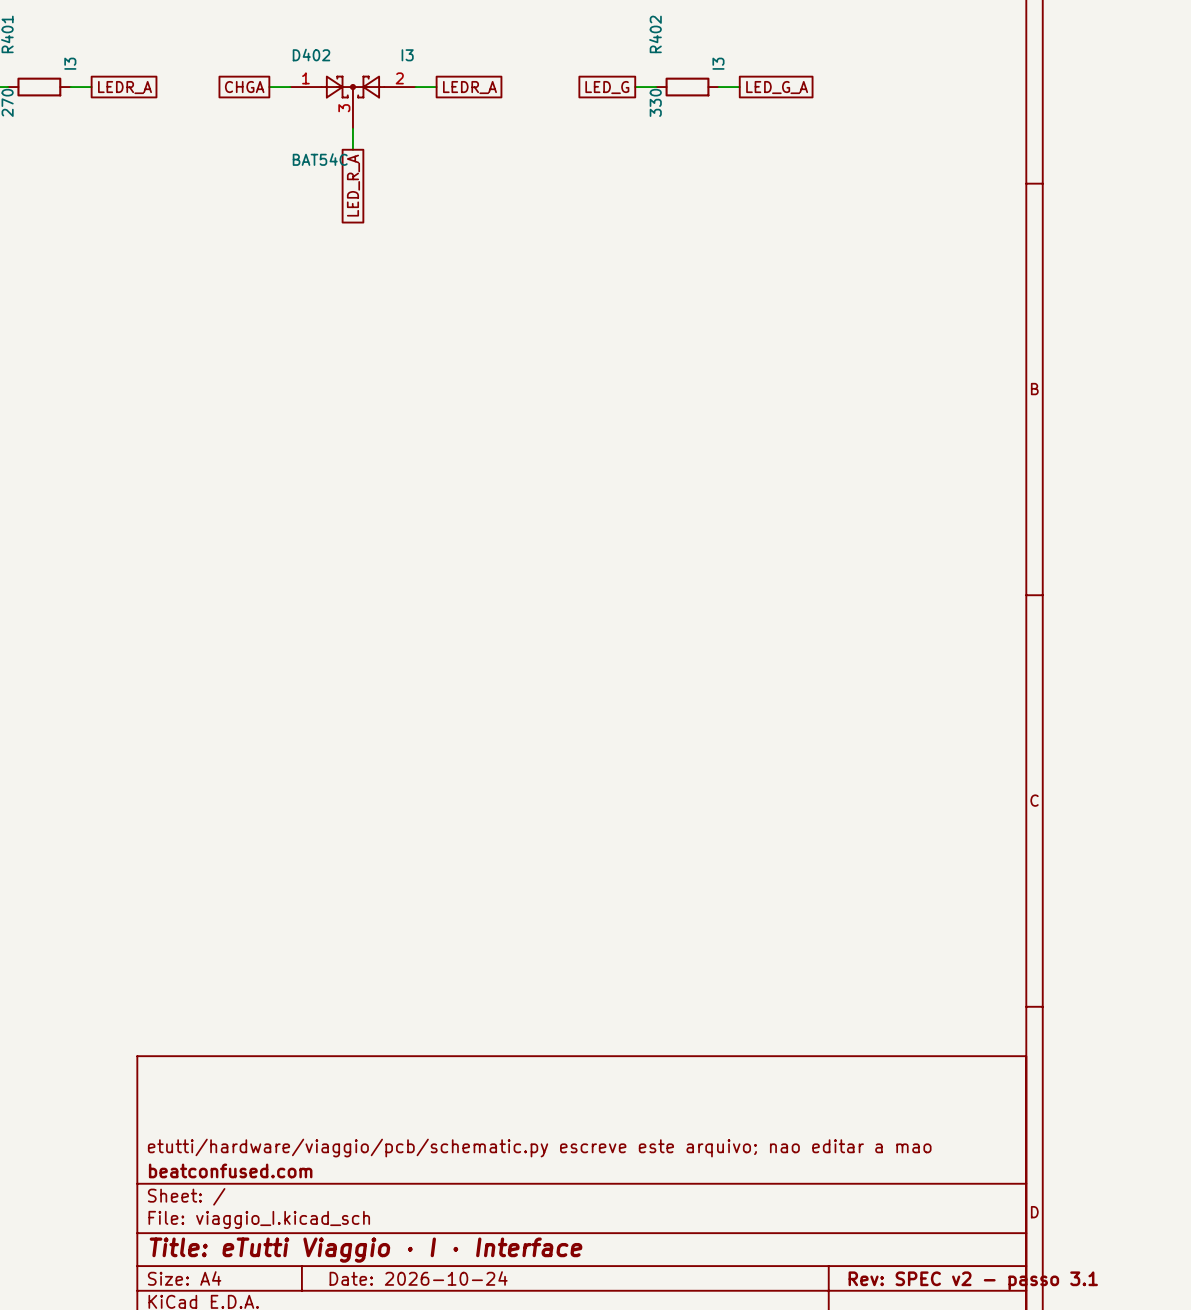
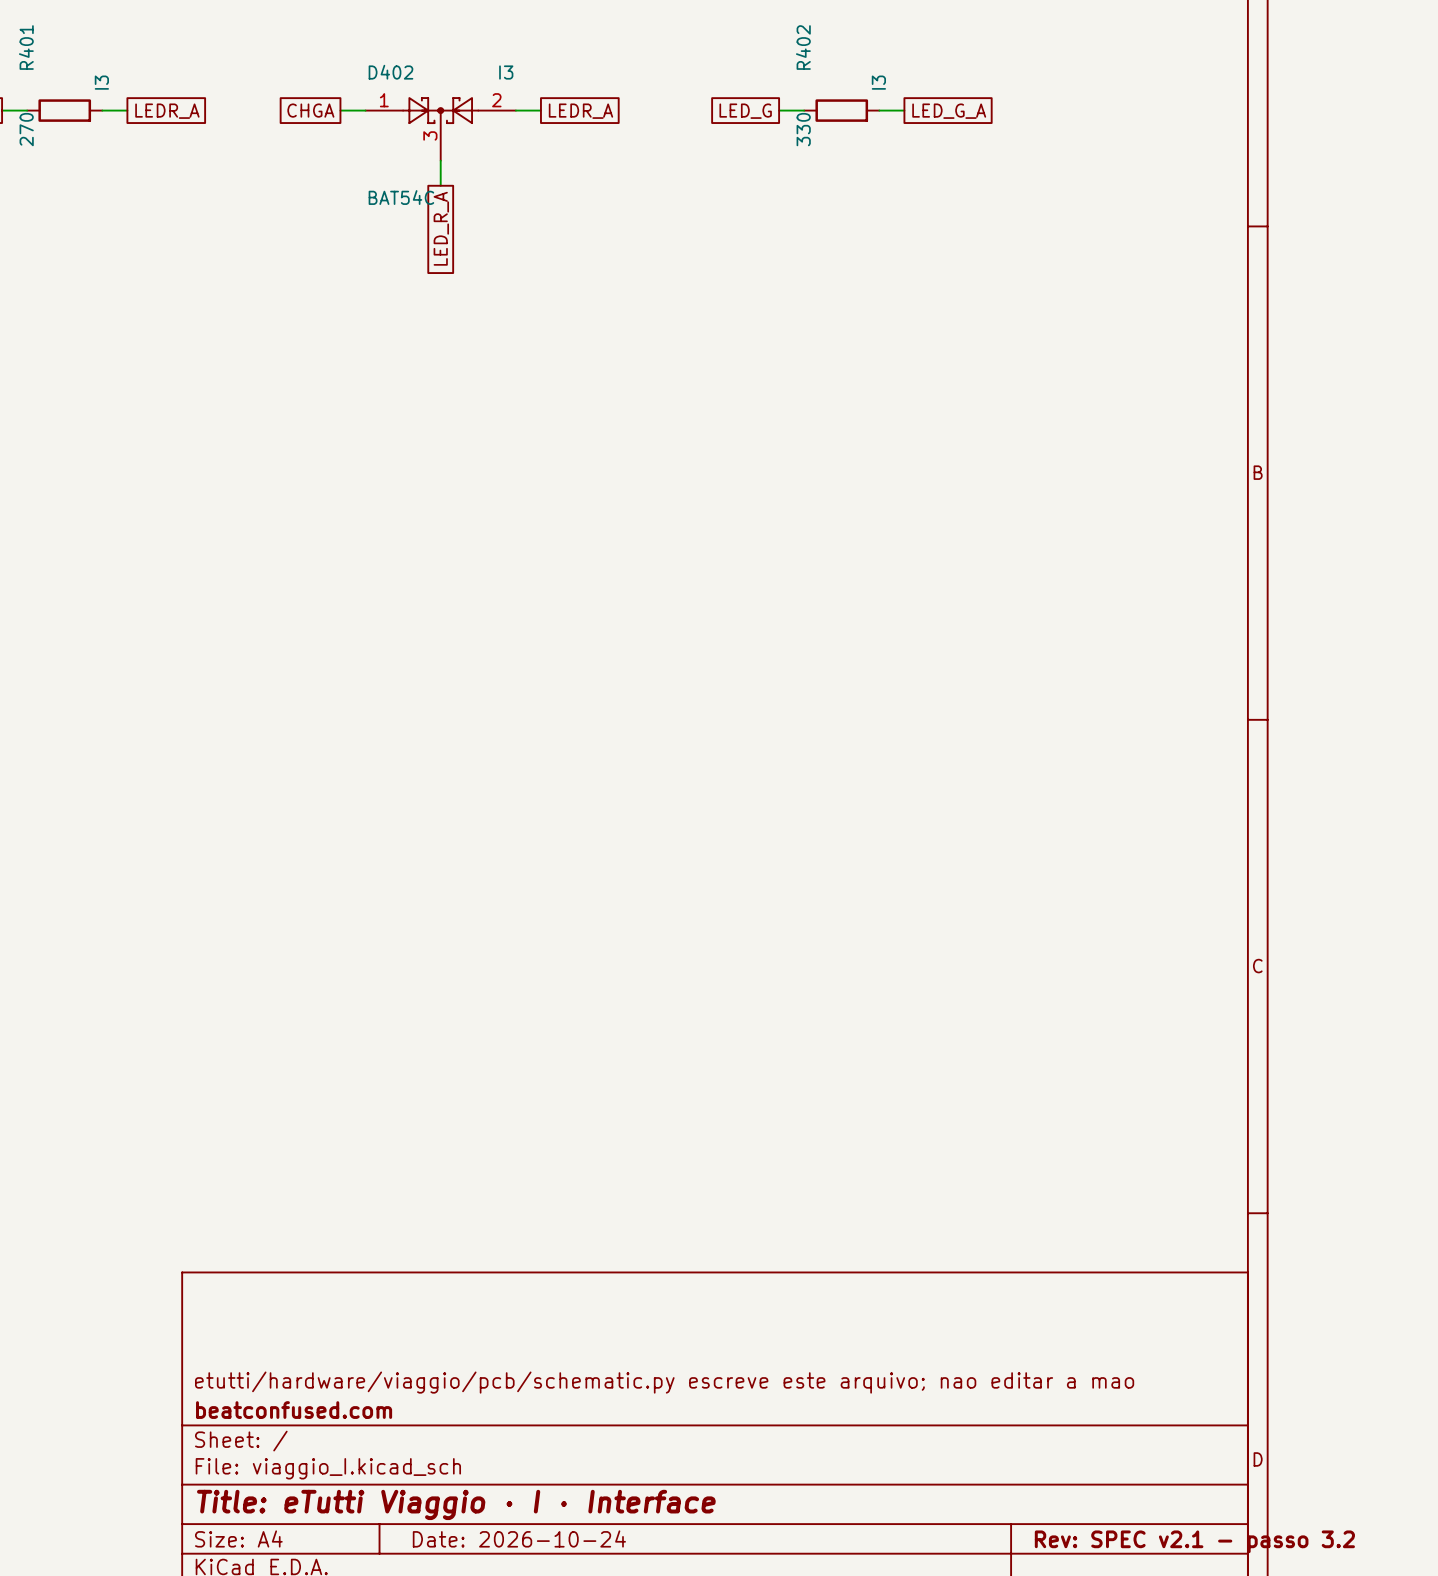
title block: Rev: SPEC v2 - passo 3.1 (973, 1280) -> Rev: SPEC v2.1 - passo 3.2 (1194, 1541)

